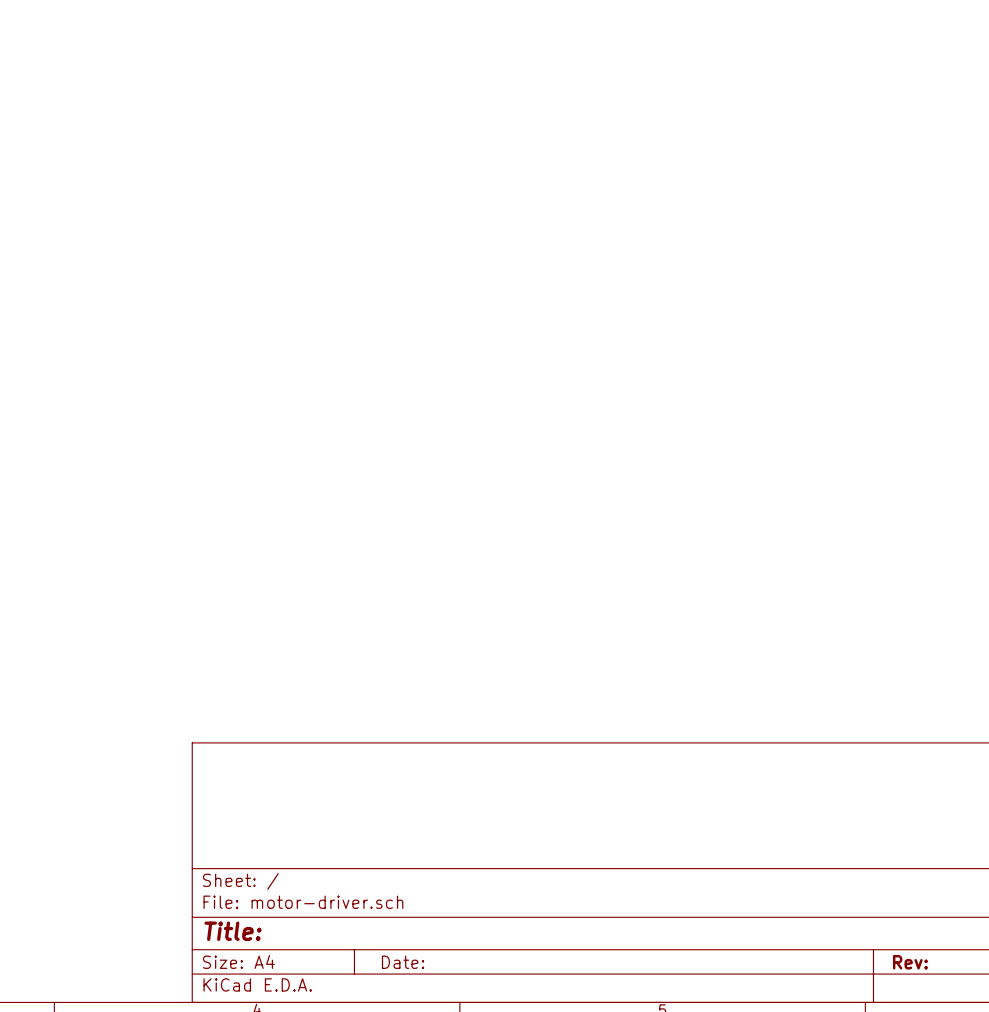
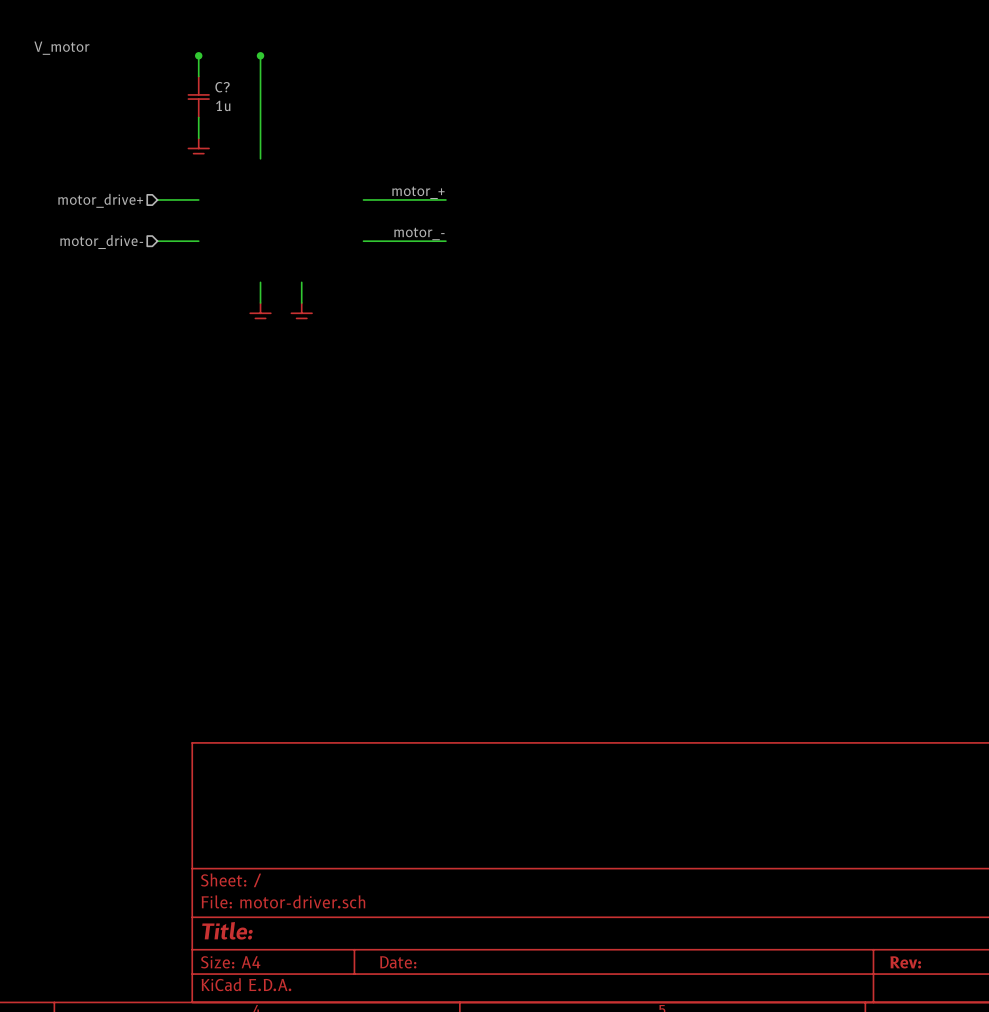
label: none -> V_motor (61, 48)
wire: none -> (198, 55) (198, 76)
junction: none -> (198, 55)
wire: none -> (260, 55) (260, 158)
junction: none -> (260, 55)
C?: none -> 1u (198, 96)
wire: none -> (198, 117) (198, 138)
power symbol: none -> (198, 148)
label: none -> motor_+ (418, 192)
wire: none -> (157, 199) (198, 199)
wire: none -> (363, 199) (445, 199)
hierarchical label: none -> motor_drive+ (100, 200)
label: none -> motor_- (419, 233)
hierarchical label: none -> motor_drive- (101, 242)
wire: none -> (157, 241) (198, 241)
wire: none -> (363, 241) (445, 241)
wire: none -> (260, 282) (260, 302)
wire: none -> (301, 282) (301, 302)
power symbol: none -> (260, 313)
power symbol: none -> (301, 313)

